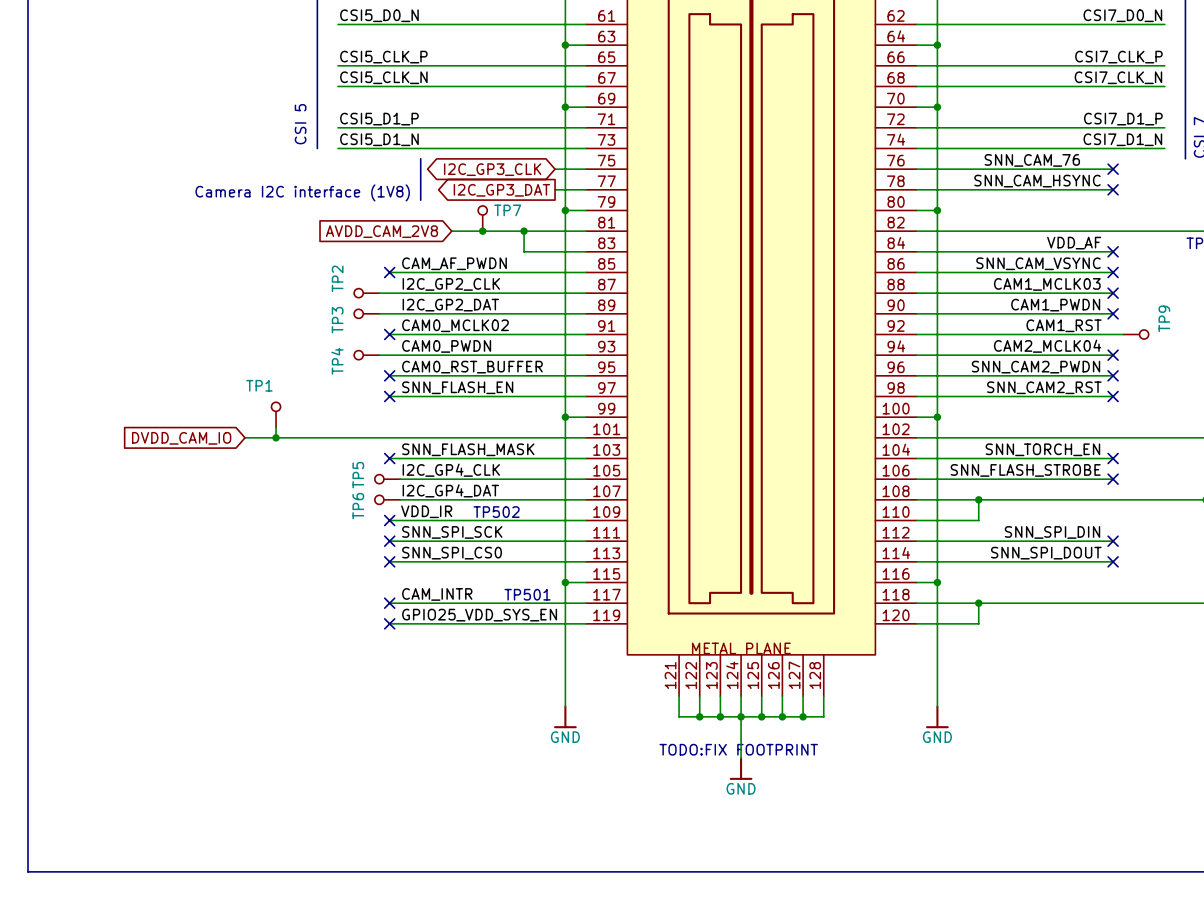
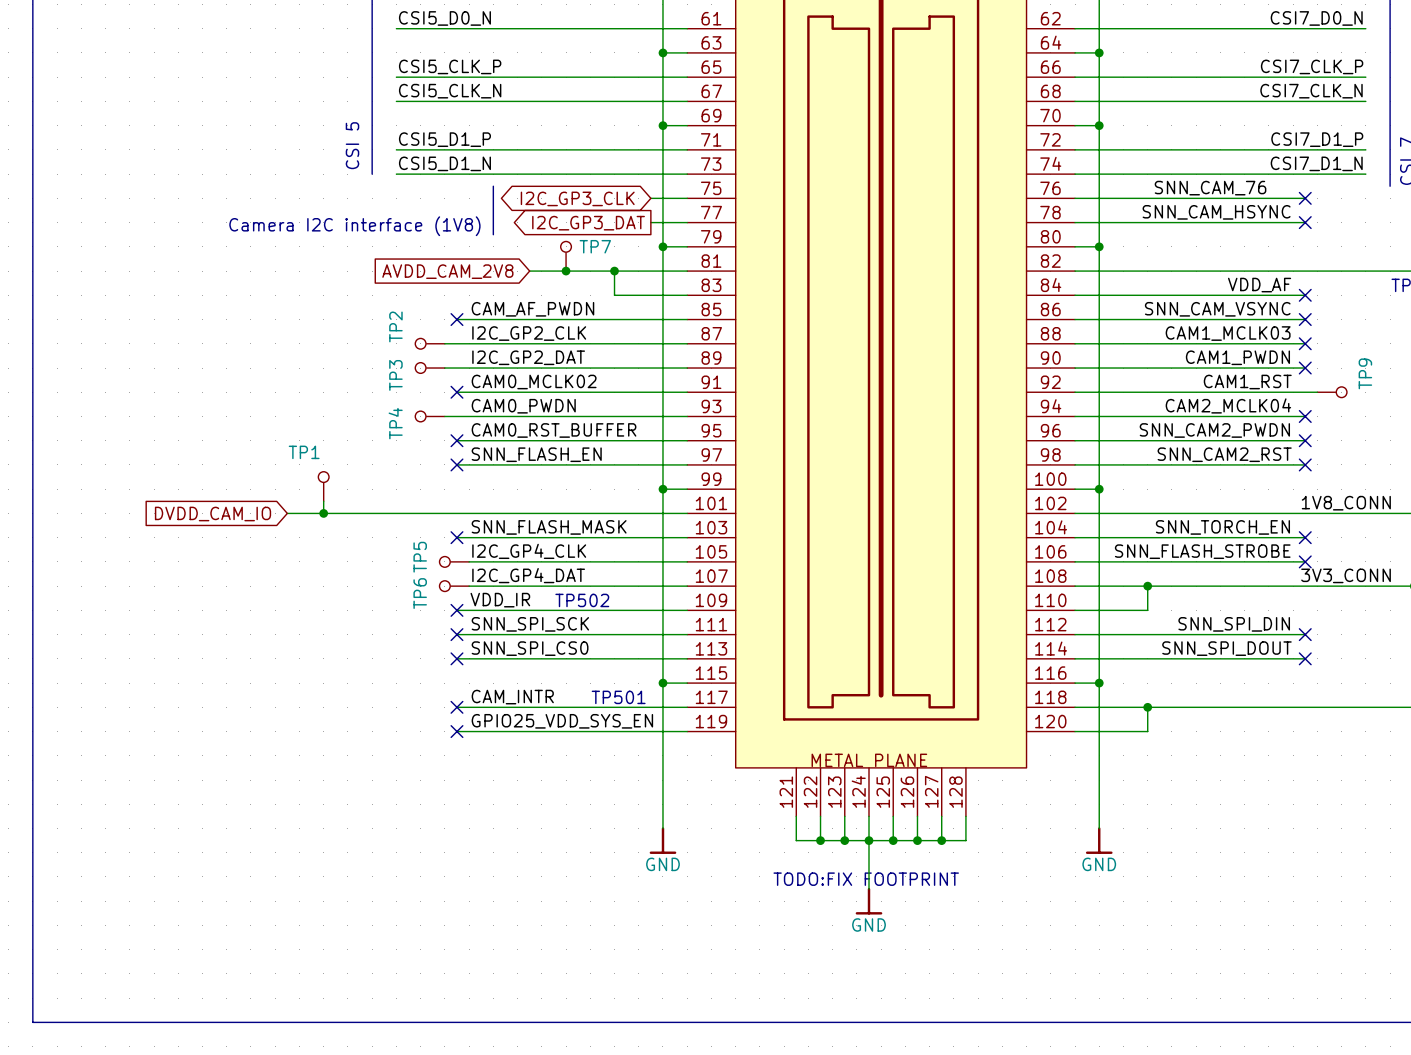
label: none -> 1V8_CONN (1346, 503)
label: none -> 3V3_CONN (1346, 575)

